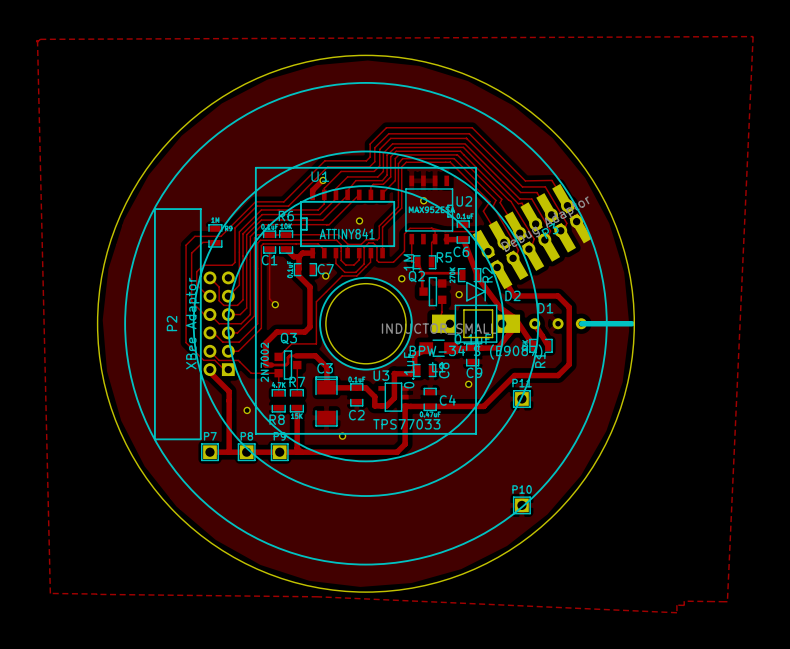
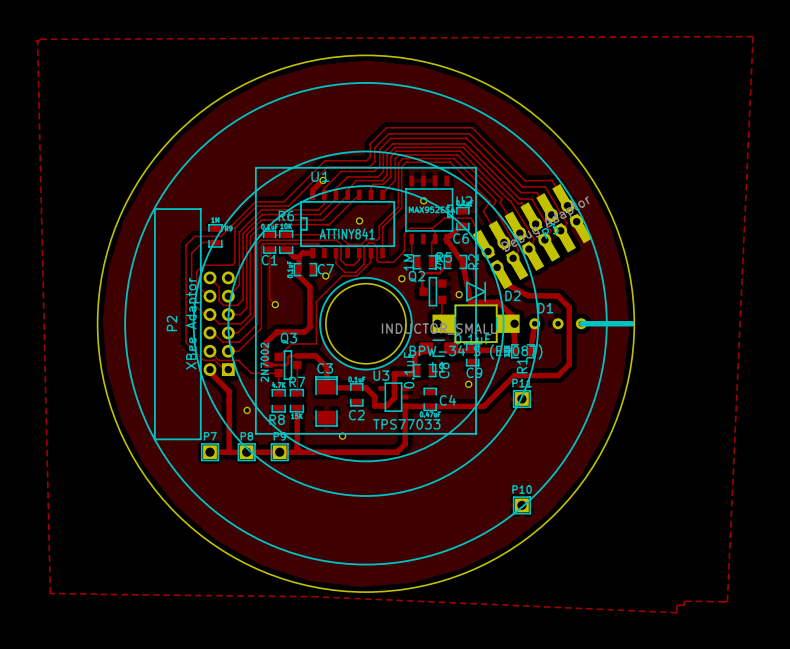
track: (432, 228) (445, 231) -> (432, 228) (444, 218)
track: (445, 231) (477, 231) (483, 243) -> (444, 218) (471, 218) (483, 243)
C6 position: (463, 232) -> (462, 218)
track: (446, 239) (463, 239) (478, 278) (500, 308) (514, 317) -> (462, 224) (446, 239) (462, 261) (470, 302) (498, 302) (514, 317)
track: (499, 271) (514, 296) (557, 296) -> (506, 284) (528, 295) (557, 296)
track: (422, 273) (461, 273) -> (422, 273) (439, 273) (447, 263)
R2 position: (469, 275) -> (455, 261)
D2 footprint: [432, 281, 521, 343] -> [432, 281, 520, 343]
board edge: none -> (455, 305) (496, 305) (496, 315) (501, 315) (501, 331) (496, 331) (496, 342) (455, 342) (455, 331) (450, 331) (450, 315) (455, 315) (455, 305)
board edge: (463, 309) (463, 337) (492, 337) (492, 309) (463, 309) -> none
track: (514, 317) (534, 345) -> none
track: (534, 324) (547, 345) -> (534, 324) (530, 349)
track: (515, 327) (498, 347) (450, 348) -> (515, 327) (515, 350) (451, 350)
R1 position: (540, 345) -> (522, 351)

